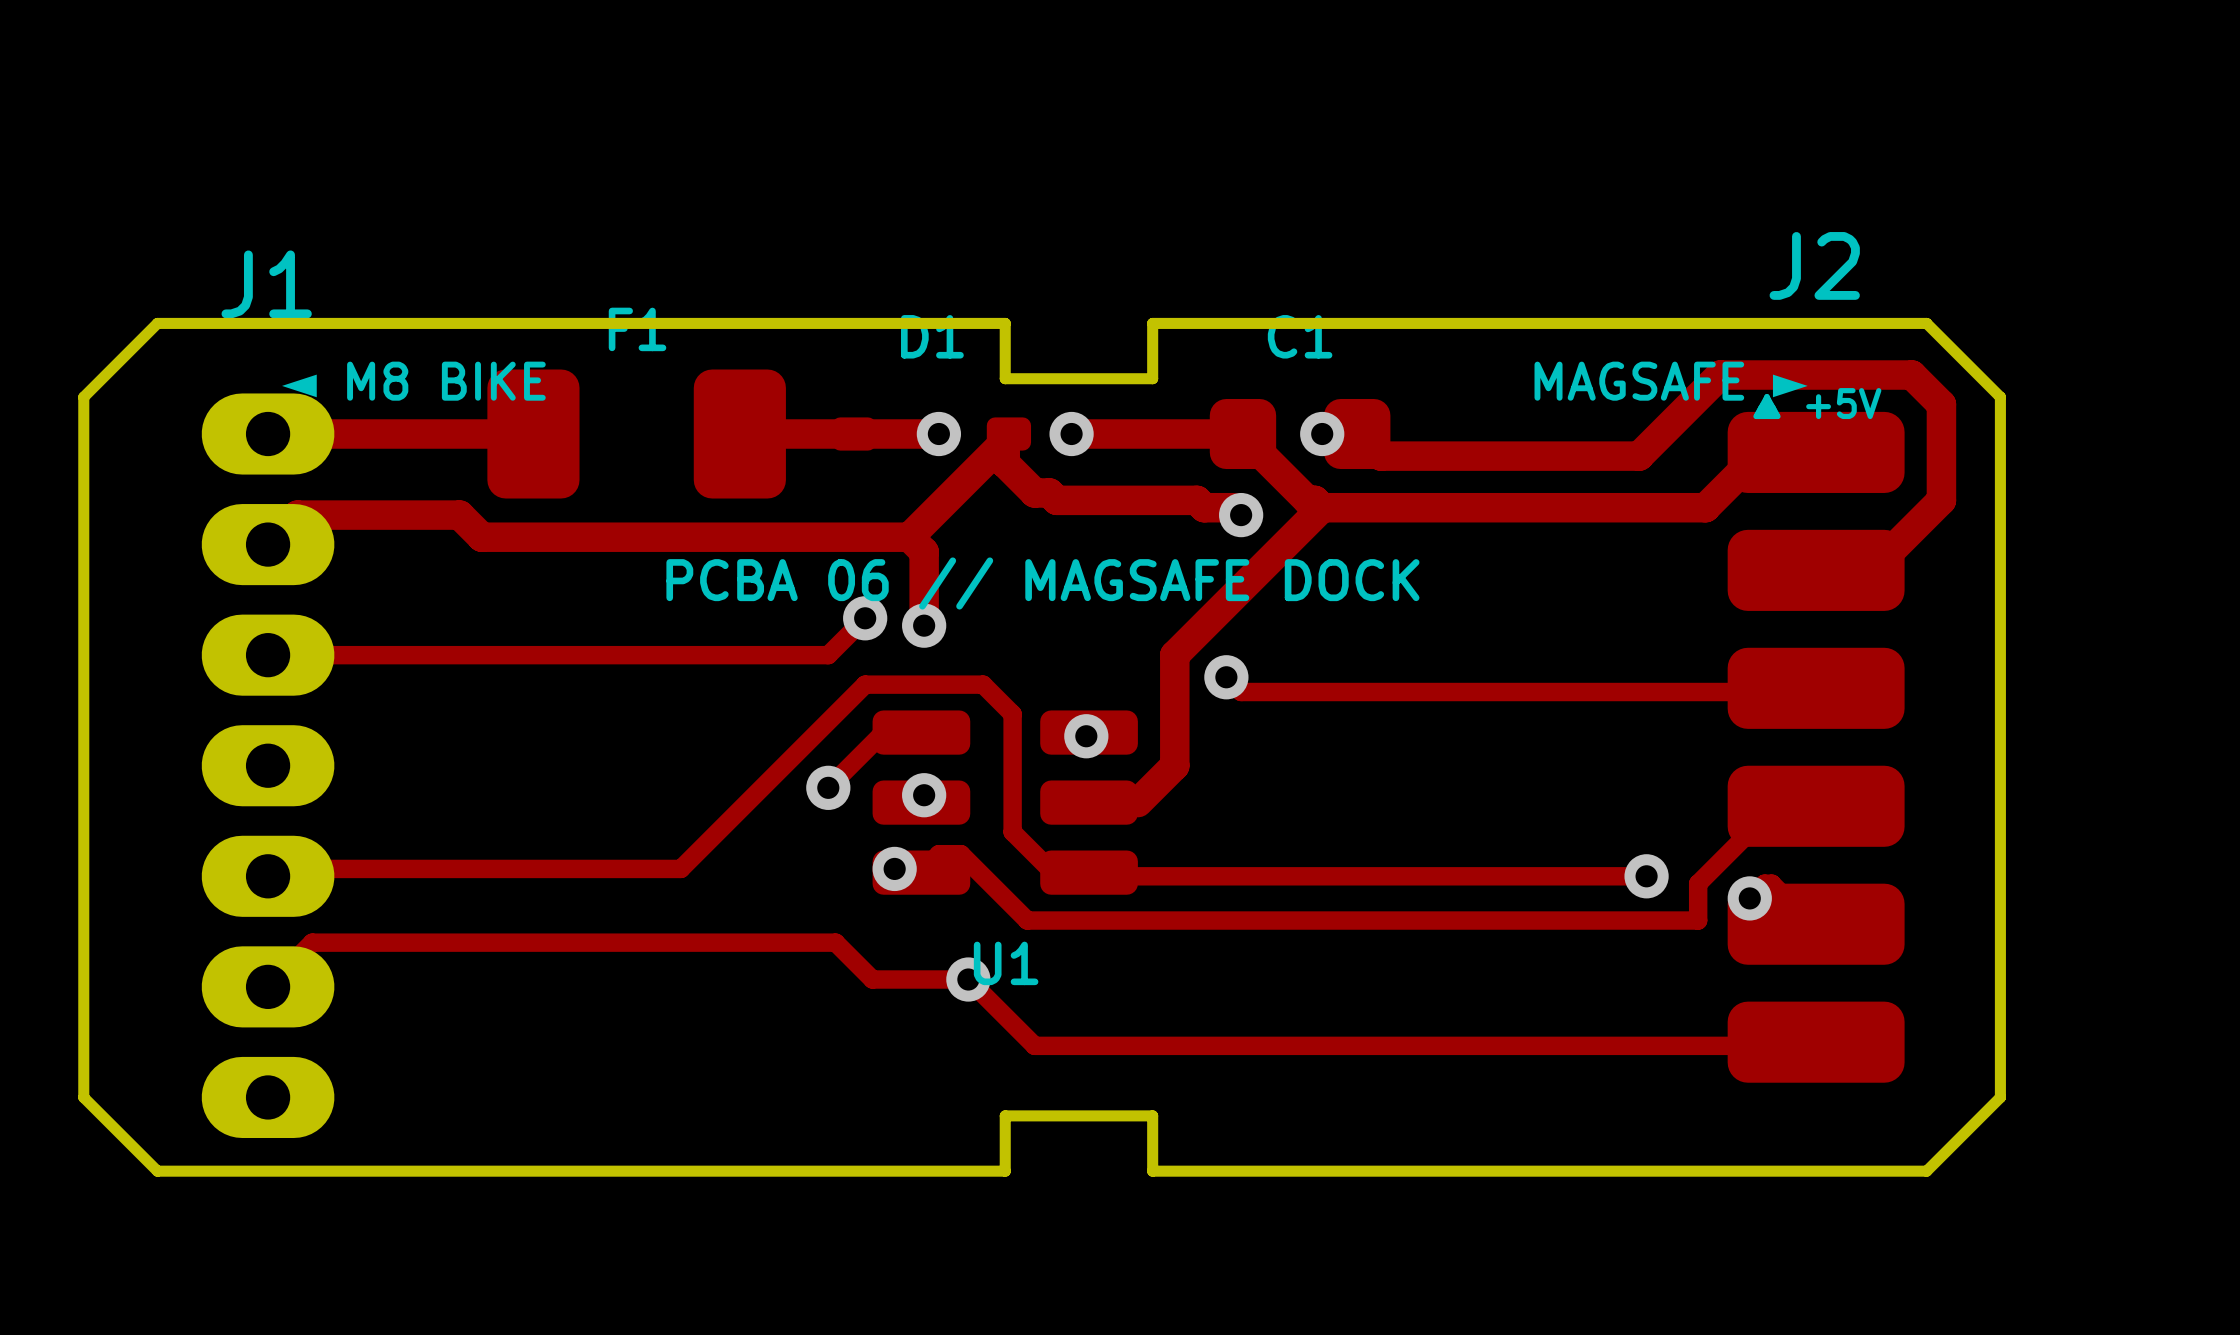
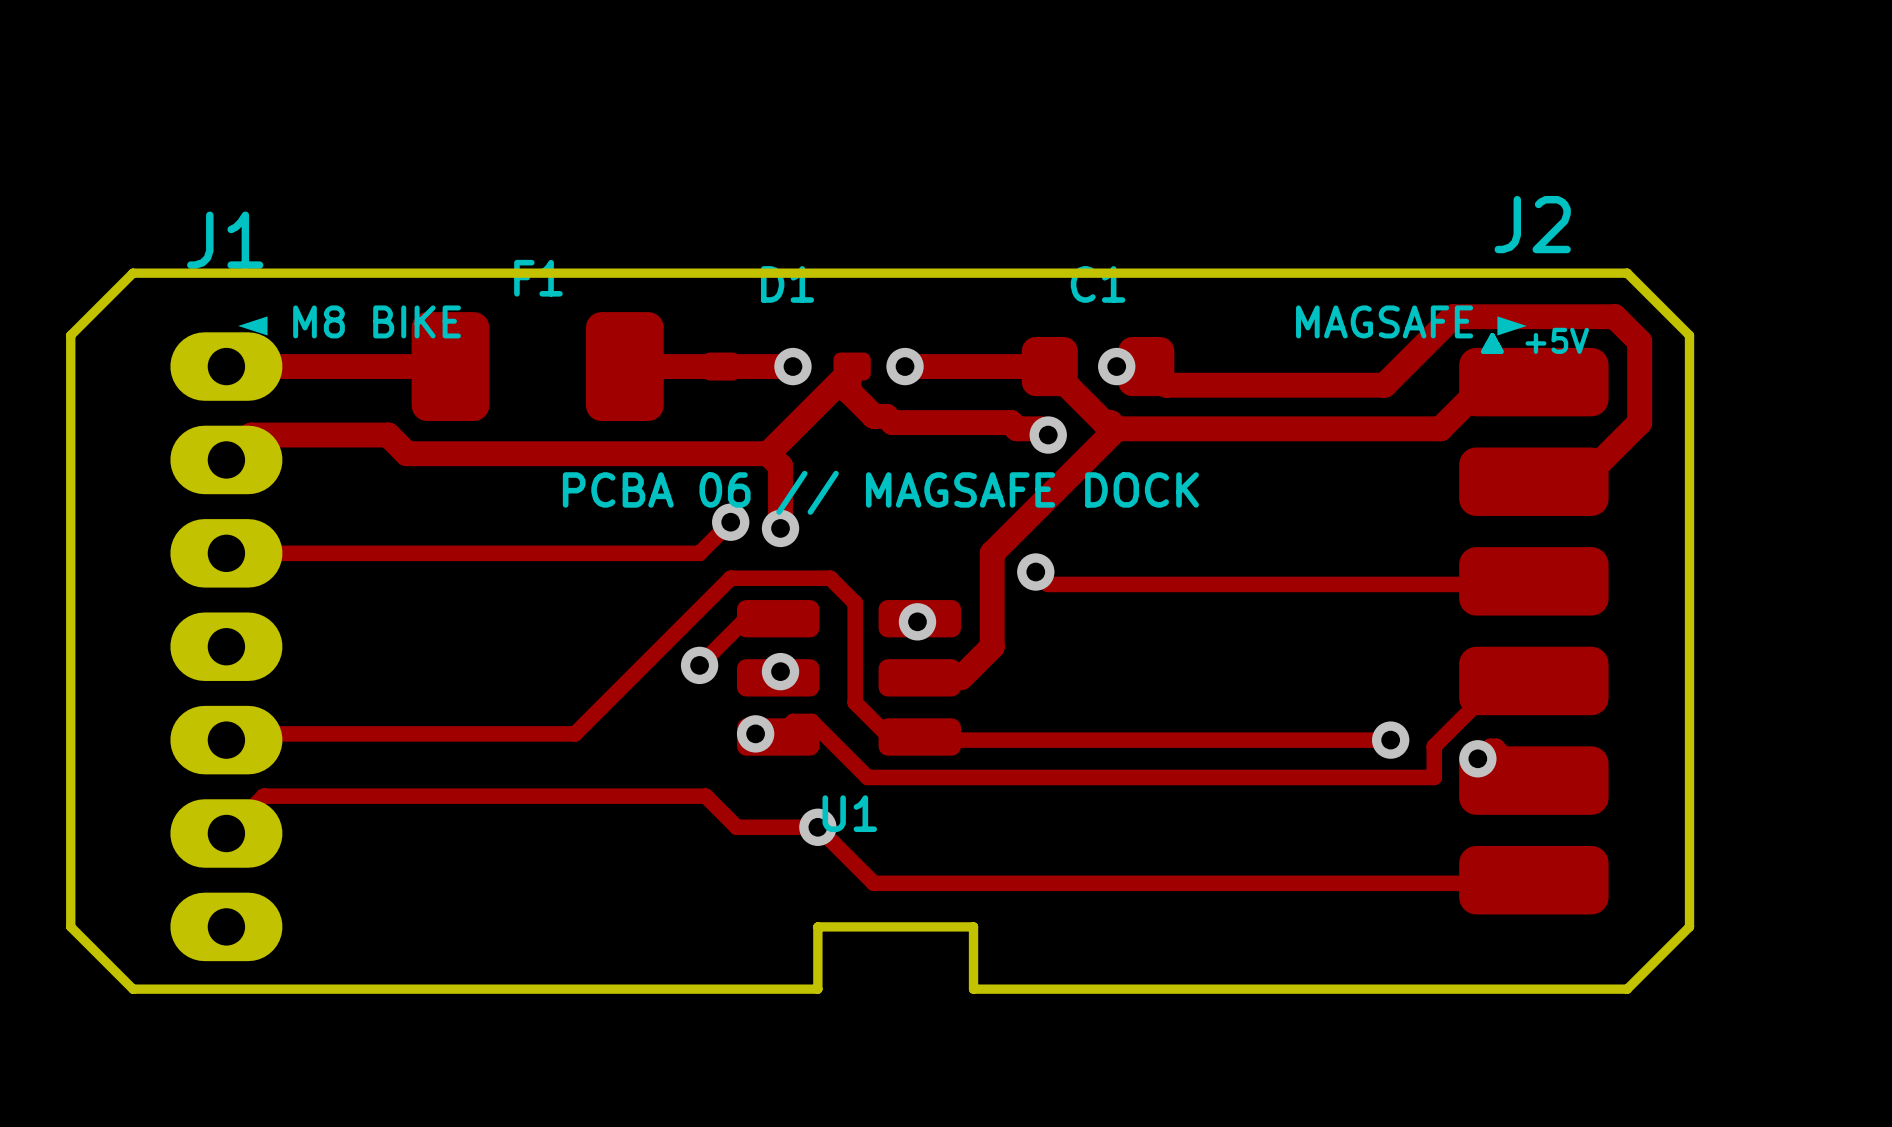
board edge: (1005, 323) (1005, 378) (1152, 378) (1152, 323) -> (849, 273) (973, 273)
board edge: (1152, 1115) (1005, 1115) (1005, 1171) (968, 1171) -> (973, 942) (973, 926) (817, 926) (817, 989)

